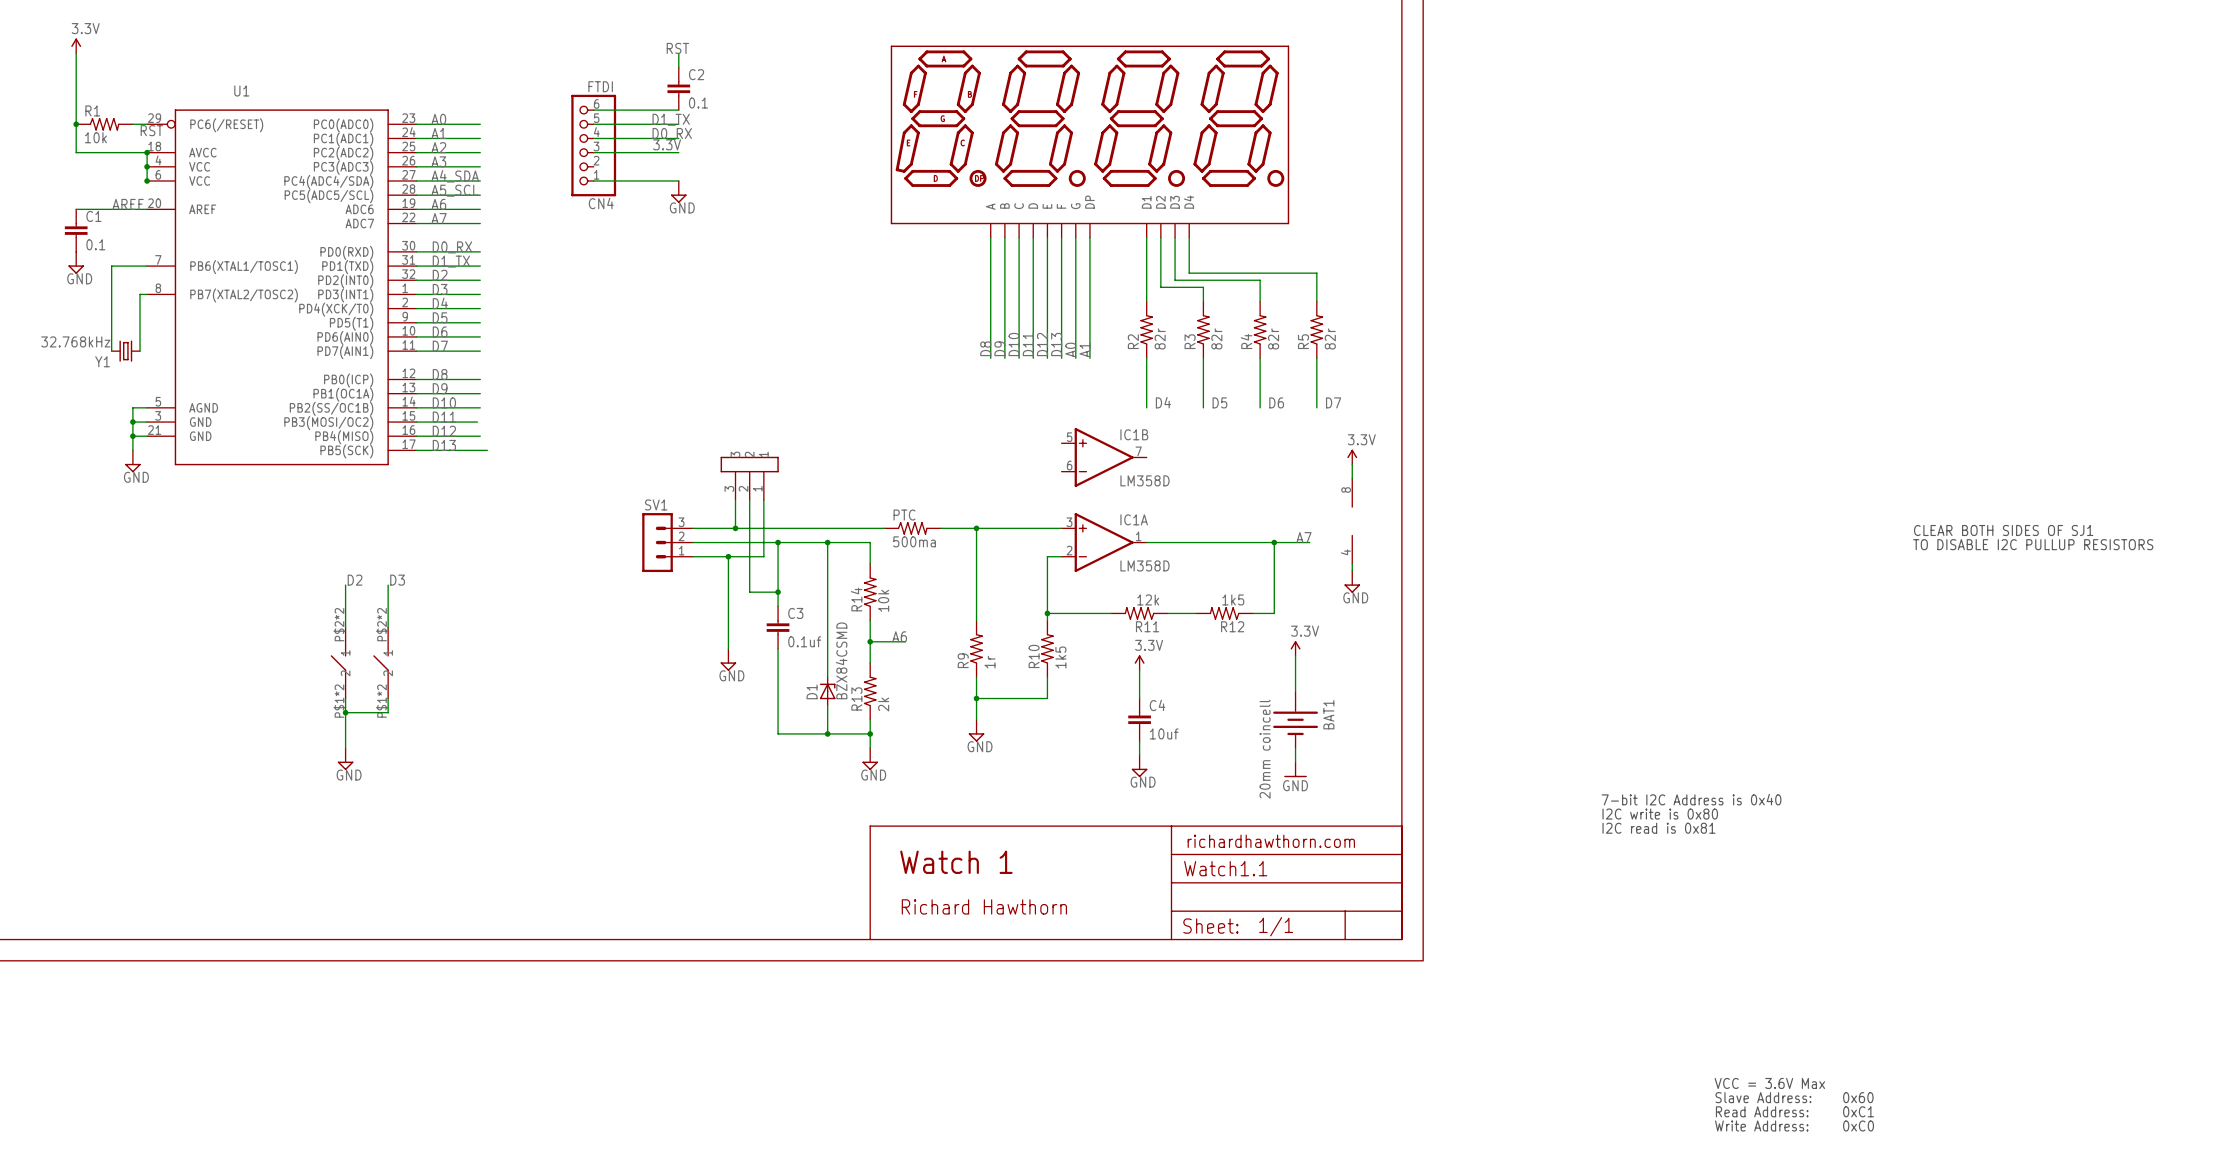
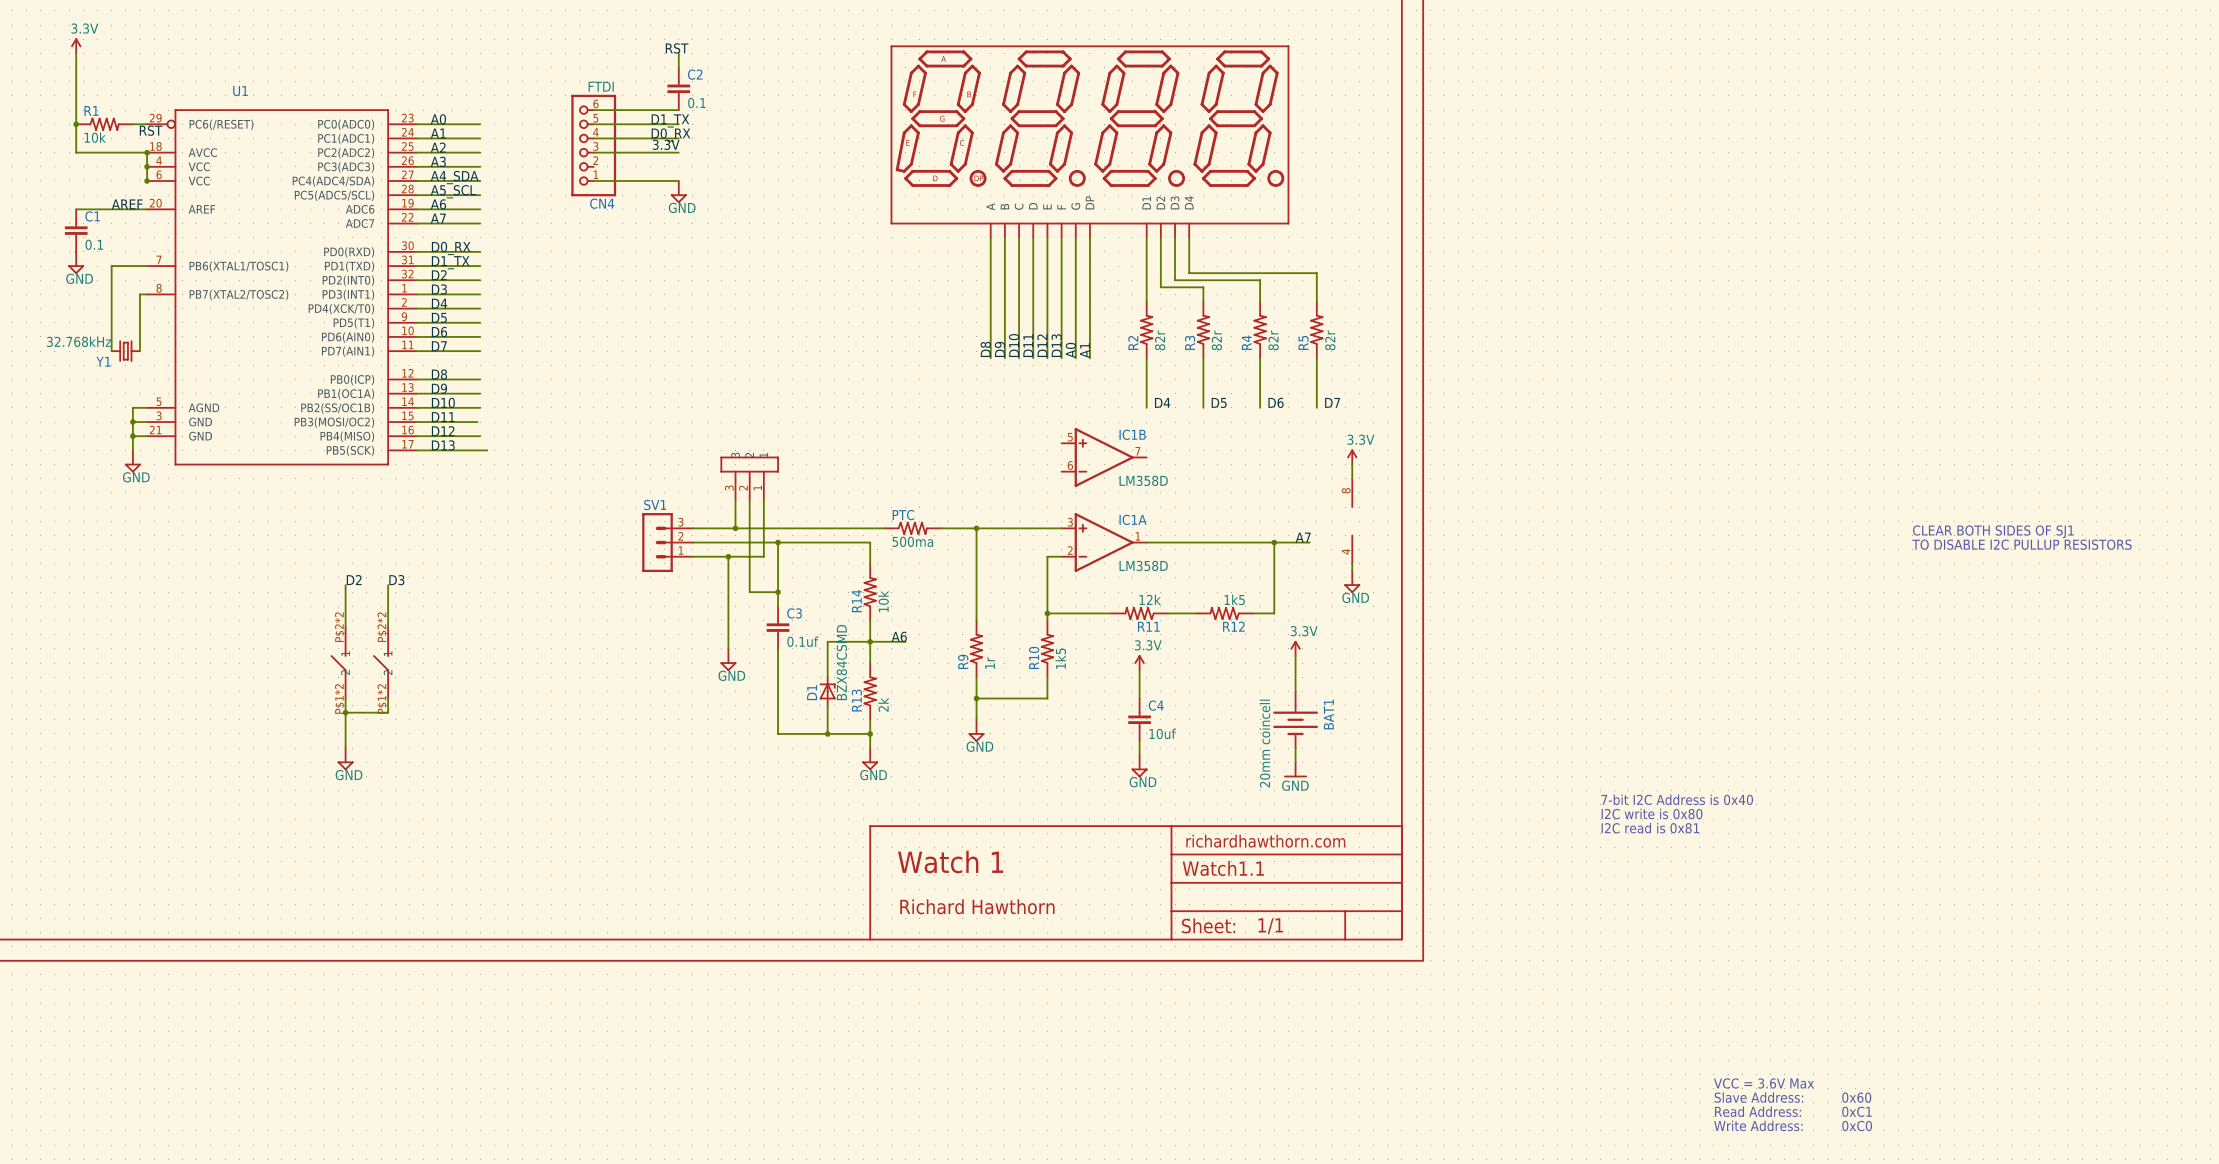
wire: (827, 542) (827, 641) -> (870, 641) (827, 641)
junction: (827, 542) -> none

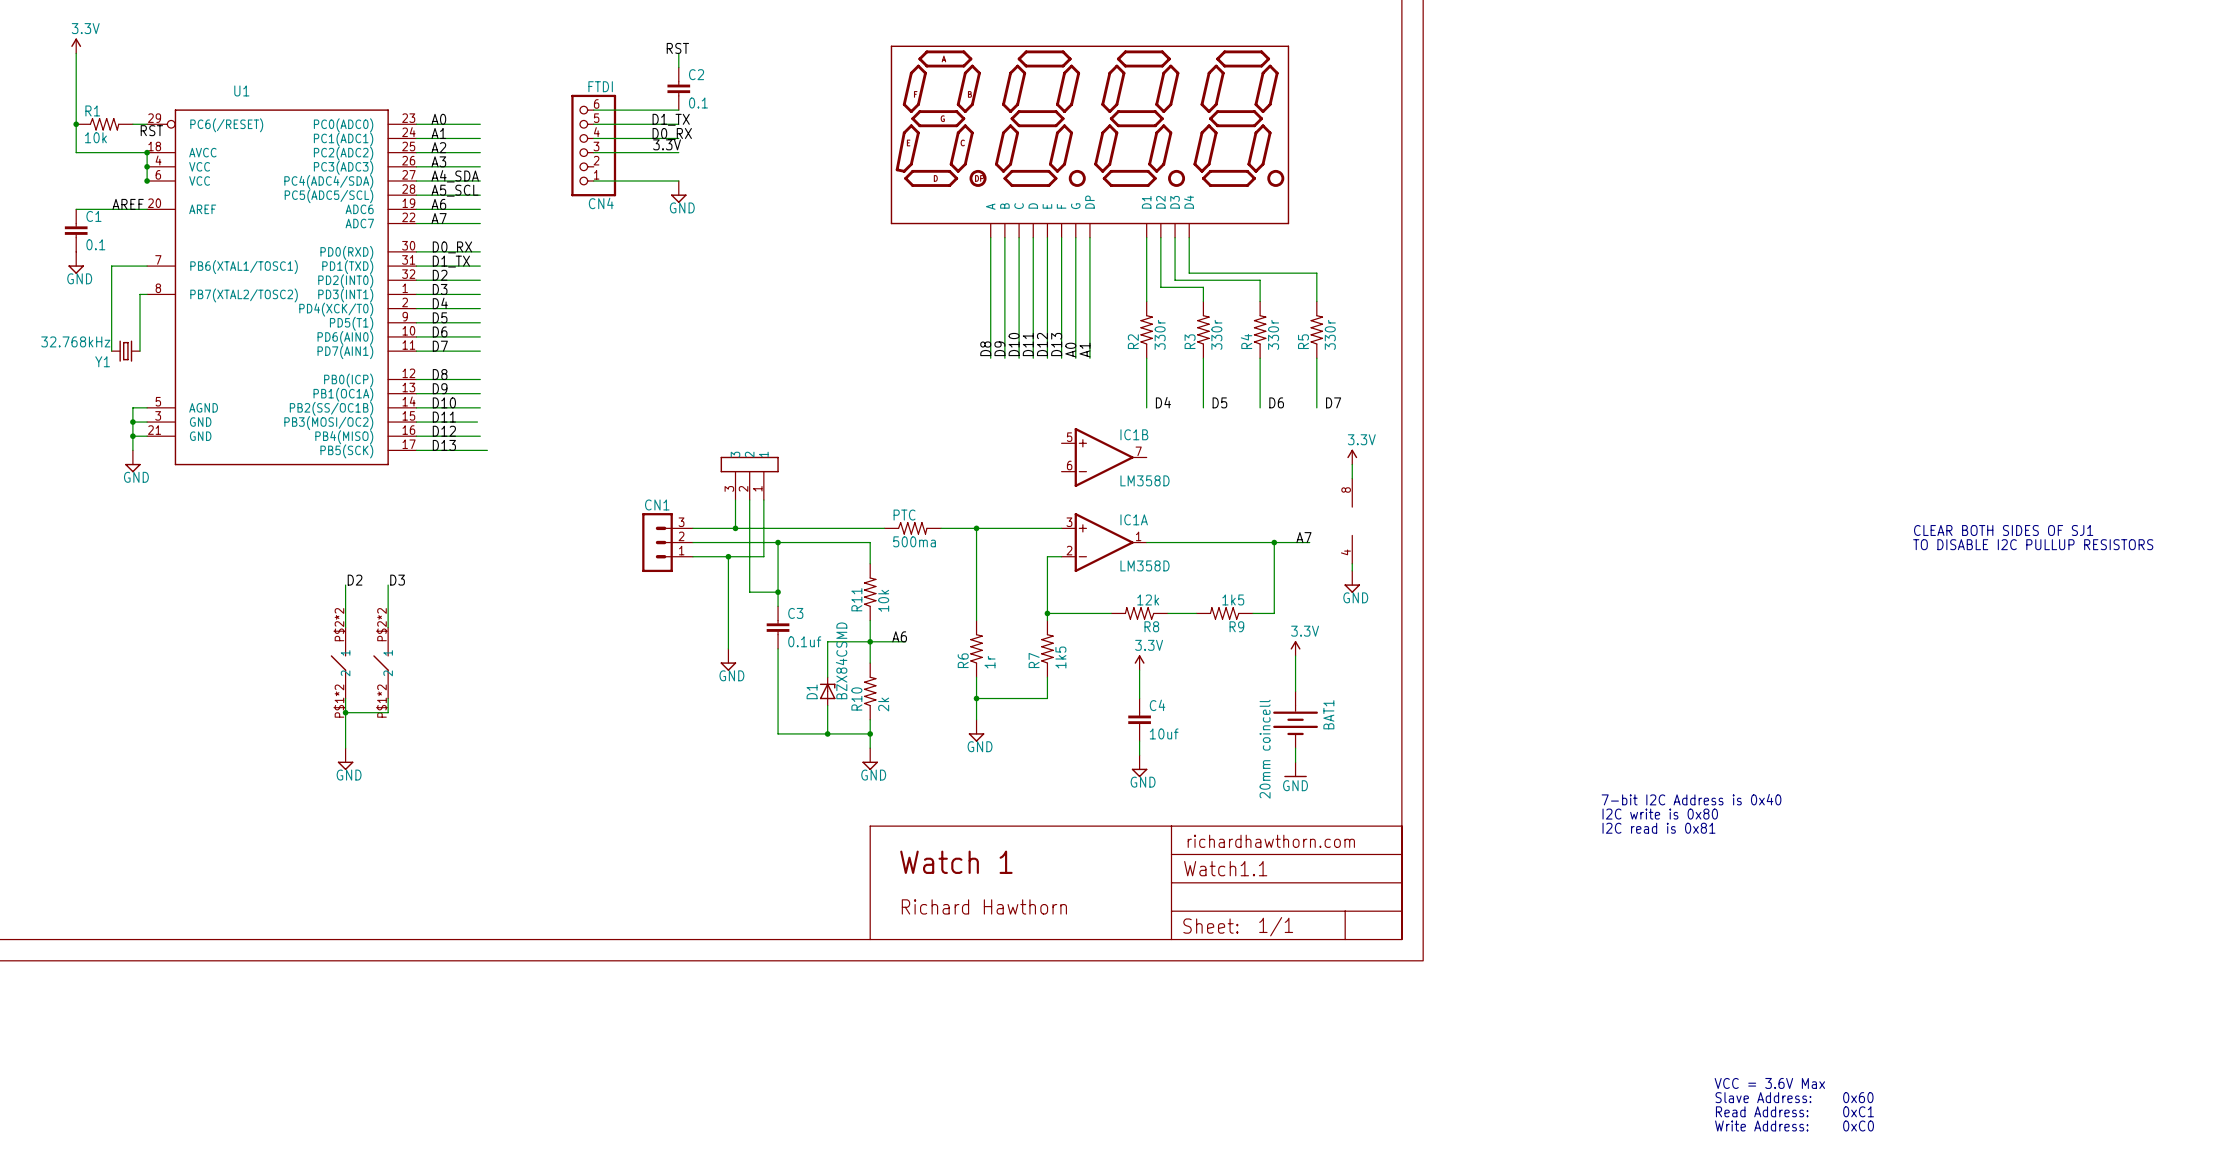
R2 value: 82r (1160, 340) -> 330r (1160, 334)
R3 value: 82r (1216, 340) -> 330r (1216, 334)
R4 value: 82r (1273, 340) -> 330r (1273, 334)
R5 value: 82r (1330, 340) -> 330r (1330, 334)
SV1 name: SV1 (655, 504) -> CN1 (657, 504)
R14 name: R14 (856, 601) -> R11 (856, 599)
R11 name: R11 (1148, 626) -> R8 (1151, 626)
R12 name: R12 (1233, 626) -> R9 (1236, 626)
R10 name: R10 (1034, 657) -> R7 (1034, 660)
R9 name: R9 (963, 661) -> R6 (963, 660)
R13 name: R13 (856, 700) -> R10 (856, 698)

